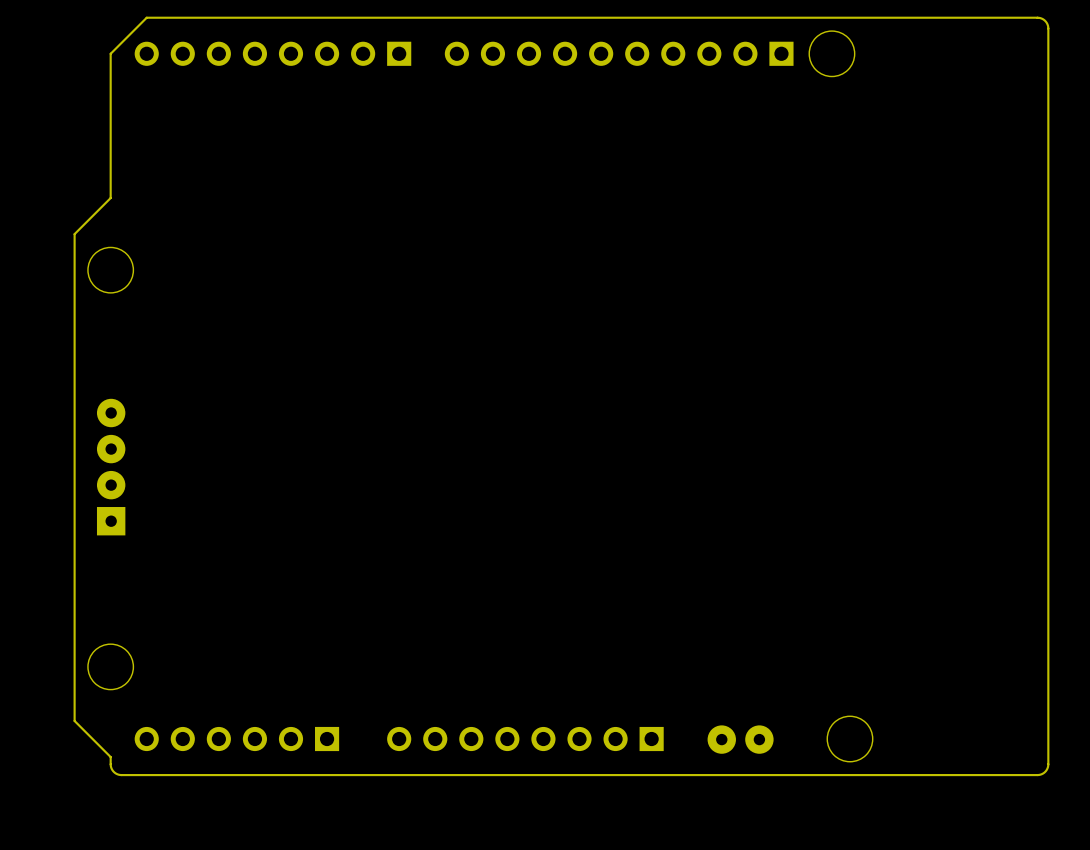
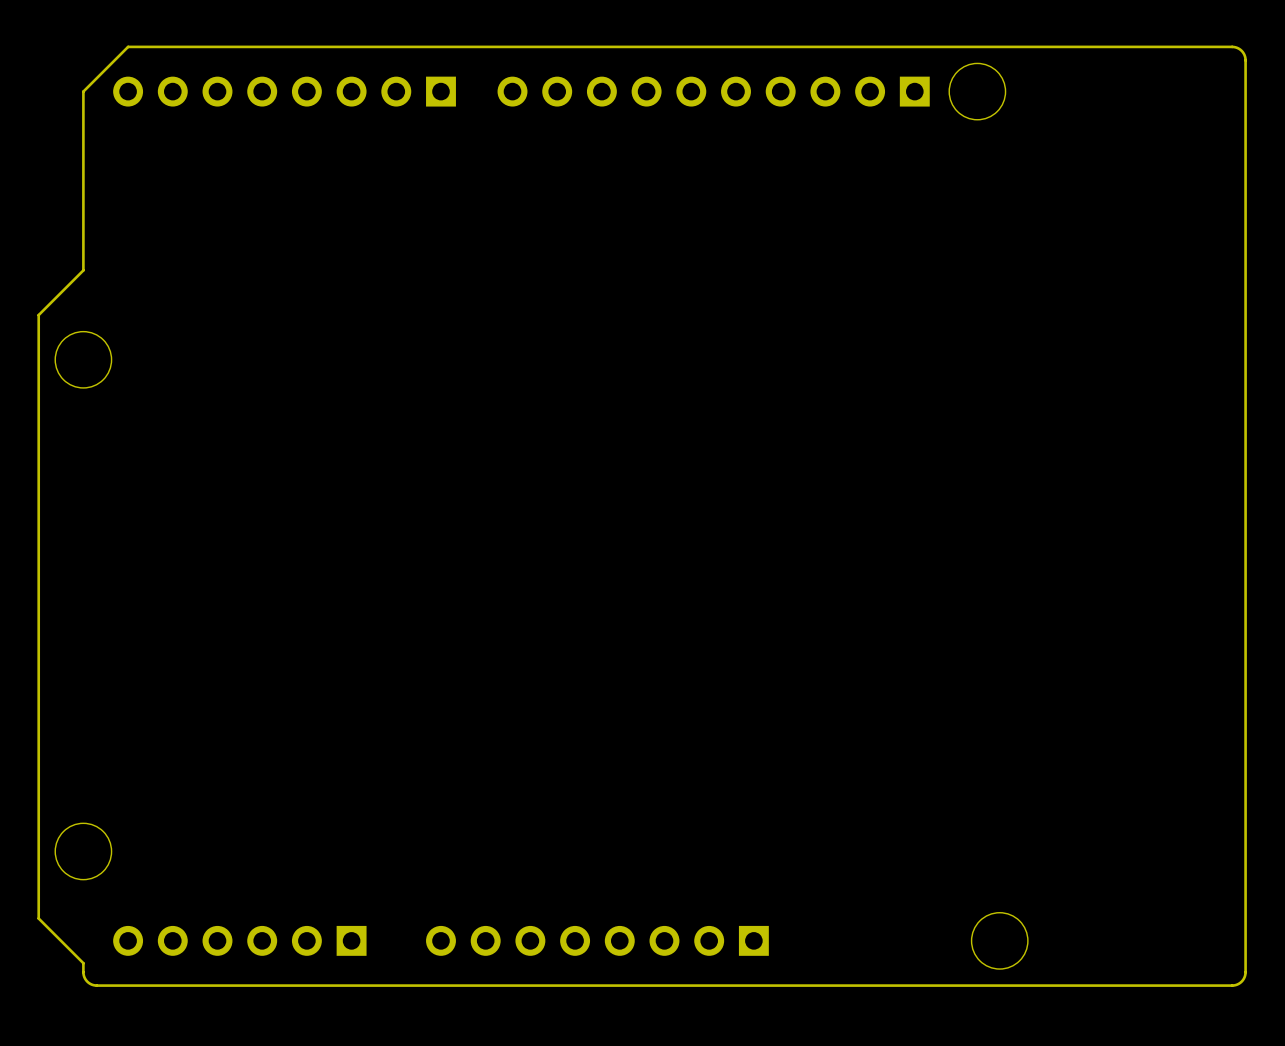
part: (111, 467) -> none
part: (740, 739) -> none

